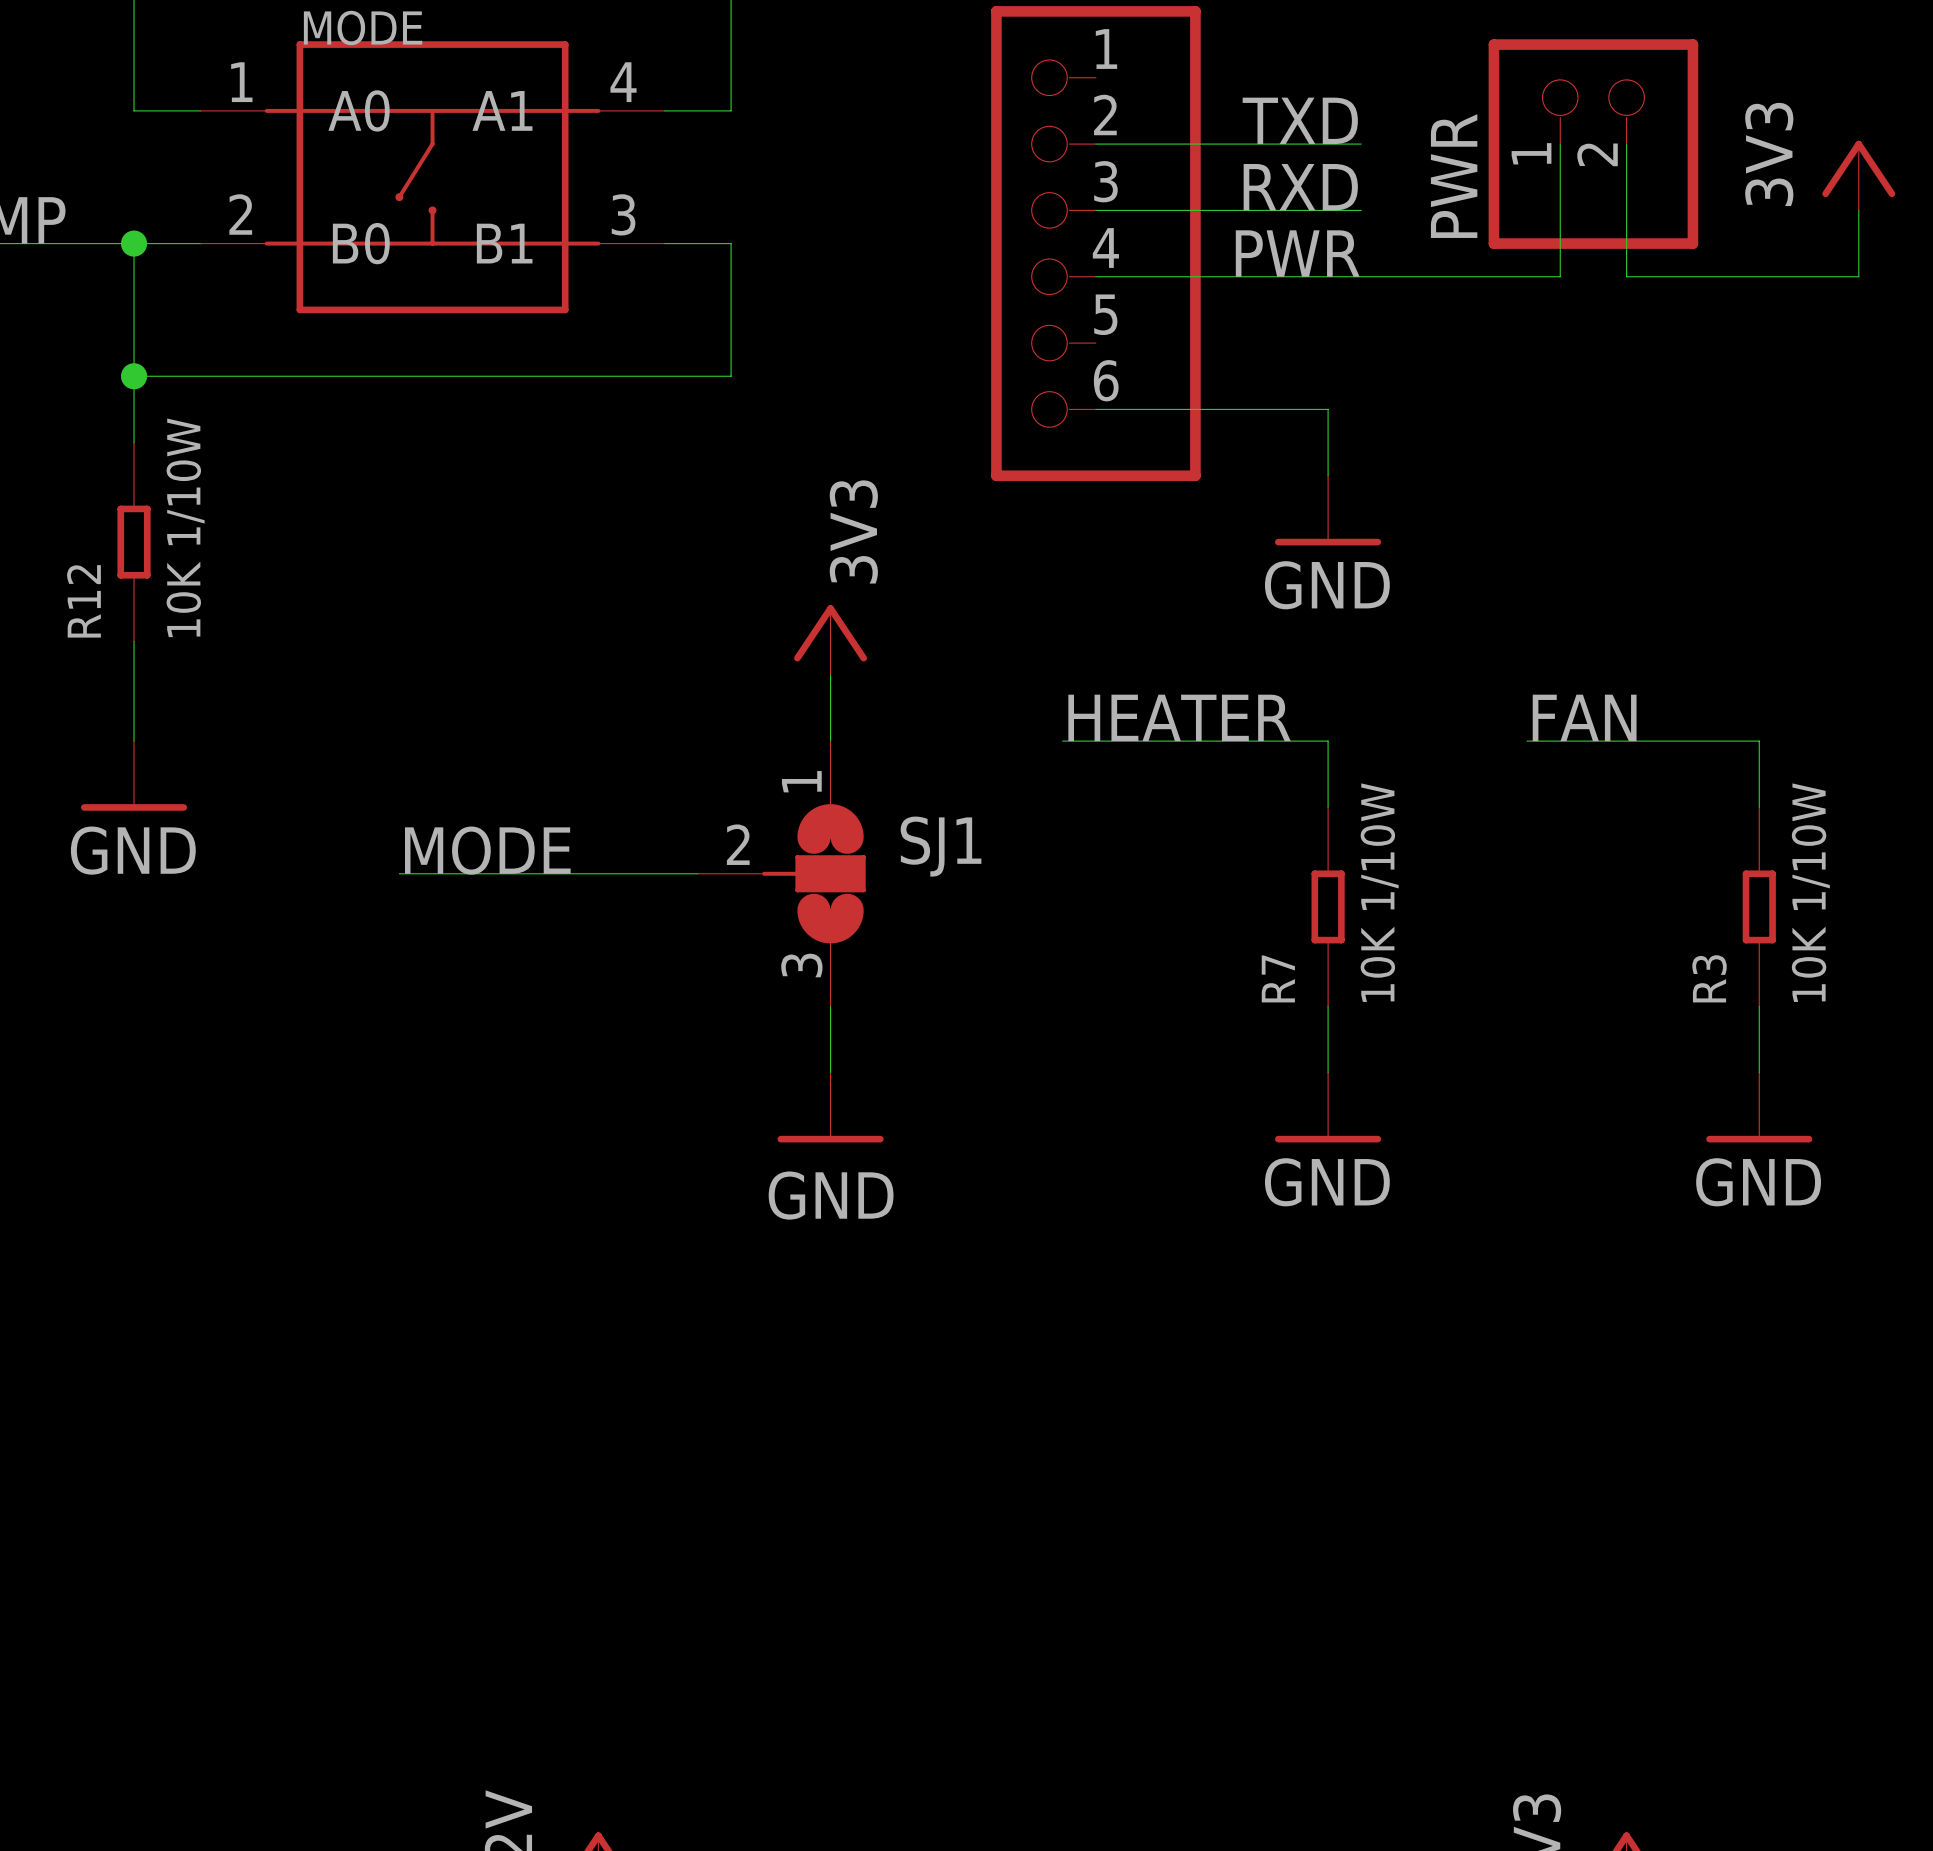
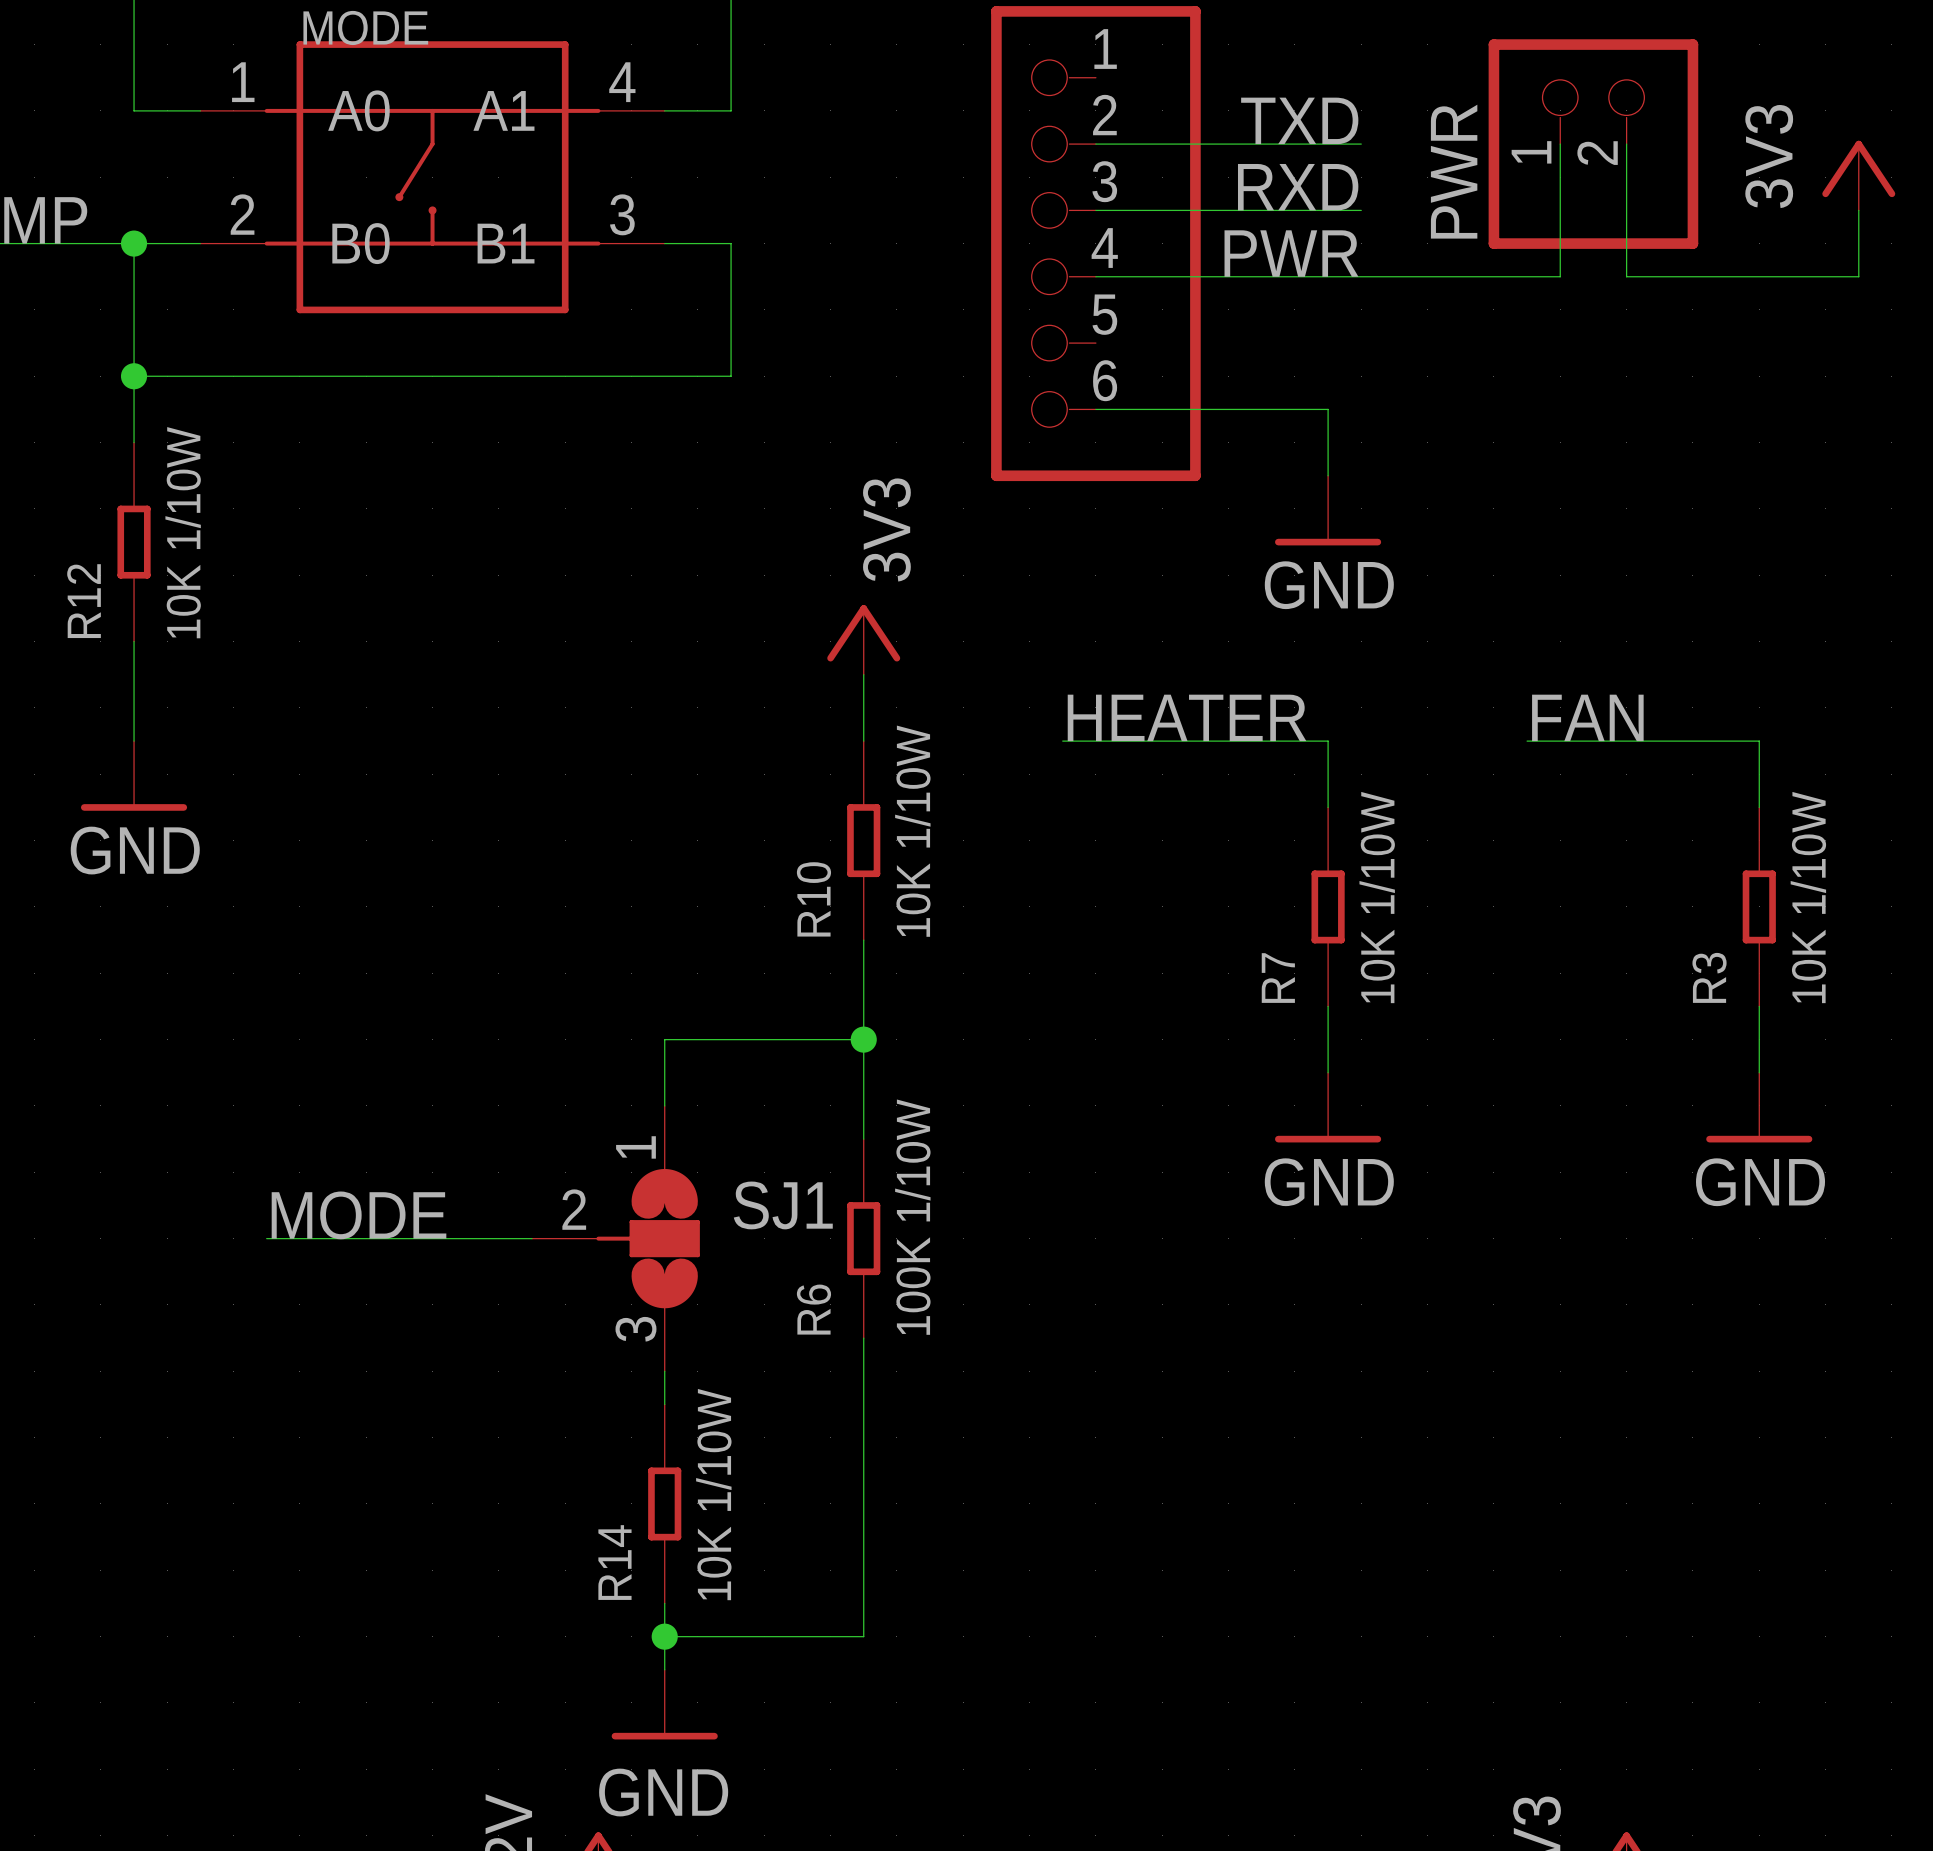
power symbol position: 3V3 (830, 639) -> 3V3 (863, 639)
wire: (830, 674) (830, 741) -> (863, 674) (863, 741)
R10: none -> 10K 1/10W (863, 840)
label position: MODE (487, 850) -> MODE (359, 1215)
wire: (399, 873) (697, 873) -> none
SJ1 position: (781, 873) -> (615, 1238)
wire: none -> (863, 940) (863, 1139)
wire: (830, 1006) (830, 1072) -> (664, 1603) (664, 1669)
wire: none -> (863, 1039) (664, 1039) (664, 1105)
junction: none -> (863, 1039)
power symbol position: GND (830, 1107) -> GND (664, 1704)
wire: none -> (266, 1238) (532, 1238)
R6: none -> 100K 1/10W (863, 1238)
wire: none -> (863, 1338) (863, 1636) (664, 1636)
wire: none -> (664, 1371) (664, 1404)
R14: none -> 10K 1/10W (664, 1503)
junction: none -> (664, 1636)

